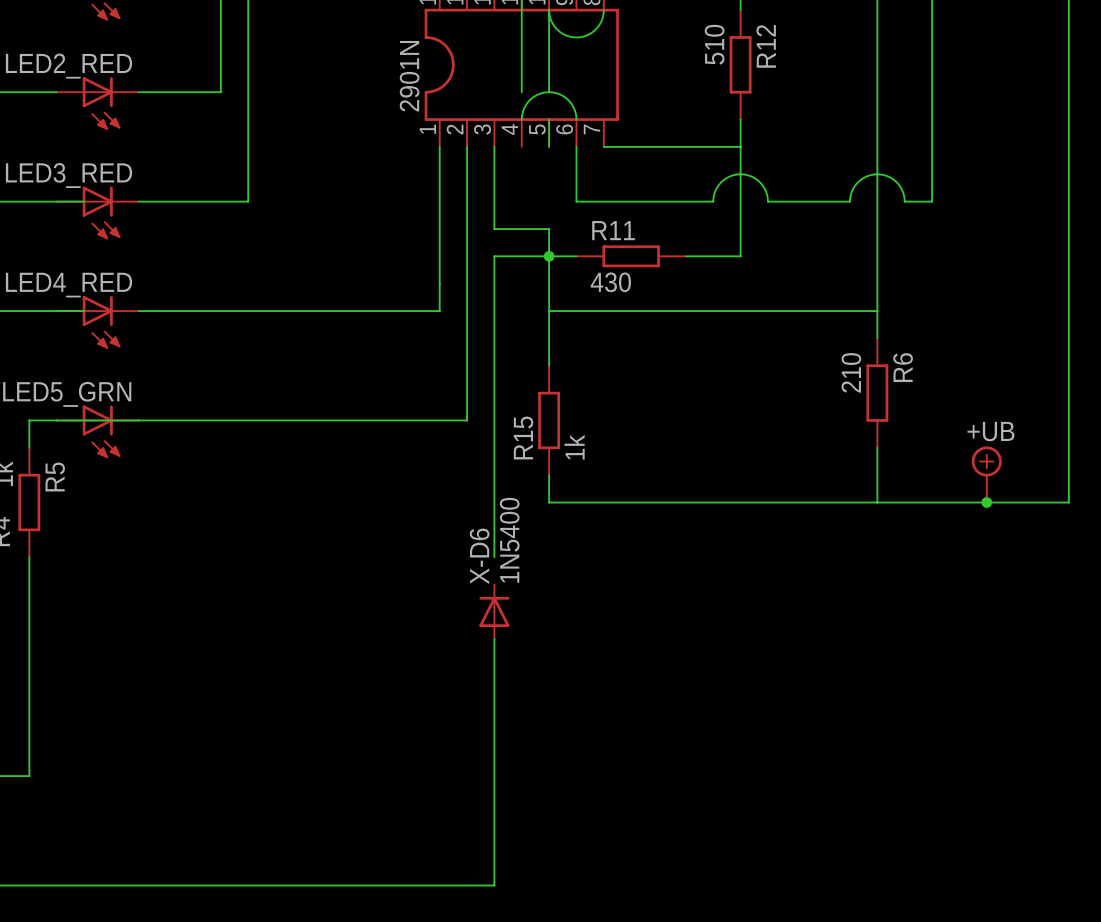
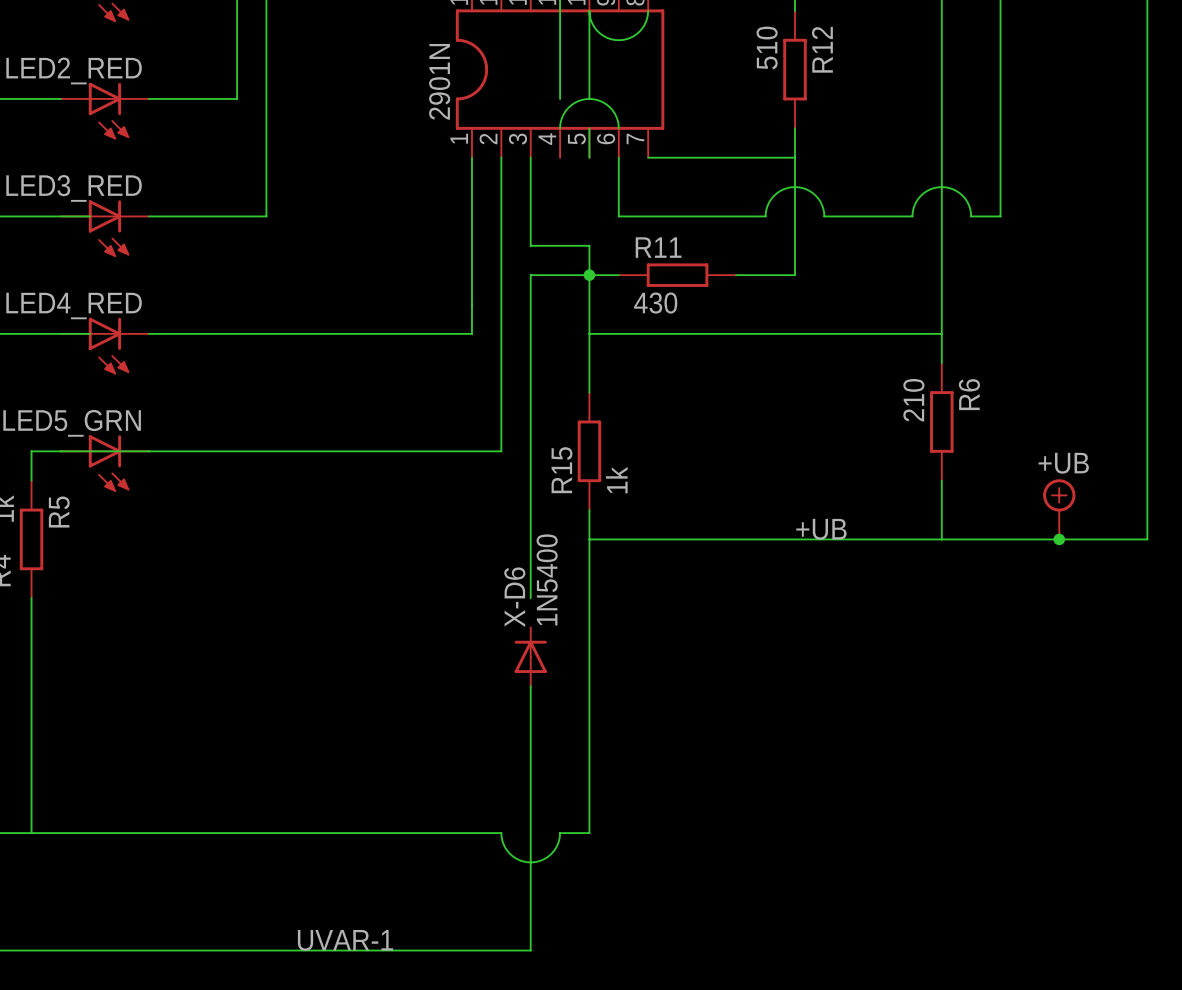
label: none -> +UB (821, 529)
wire: none -> (589, 539) (589, 833) (560, 833) (556, 847) (545, 858) (530, 862) (516, 858) (505, 847) (501, 833) (31, 833)
label: none -> UVAR-1 (345, 940)

